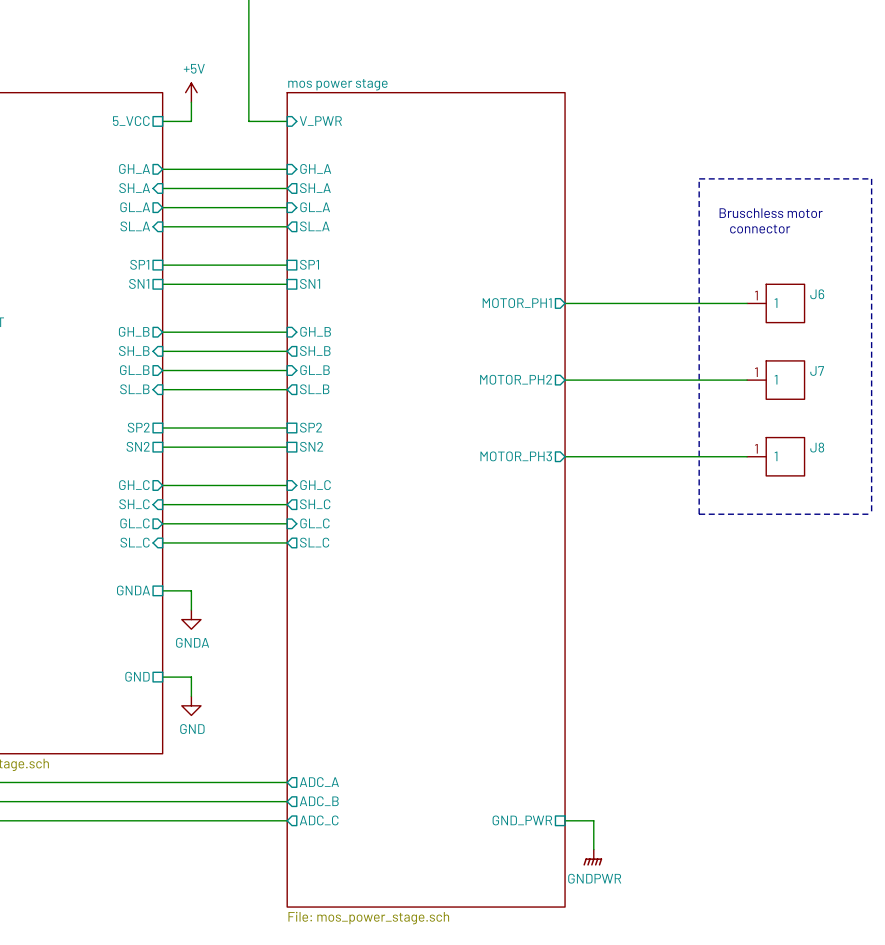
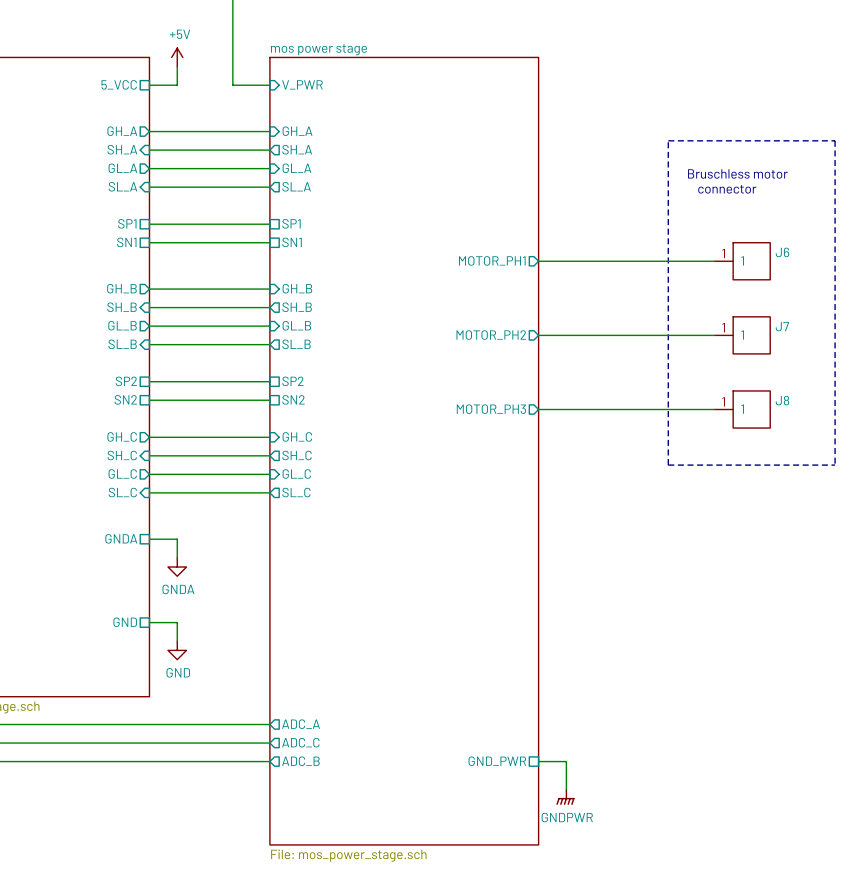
sheet pin: ADC_B (319, 801) -> ADC_C (300, 742)
sheet pin: ADC_C (319, 820) -> ADC_B (300, 761)

